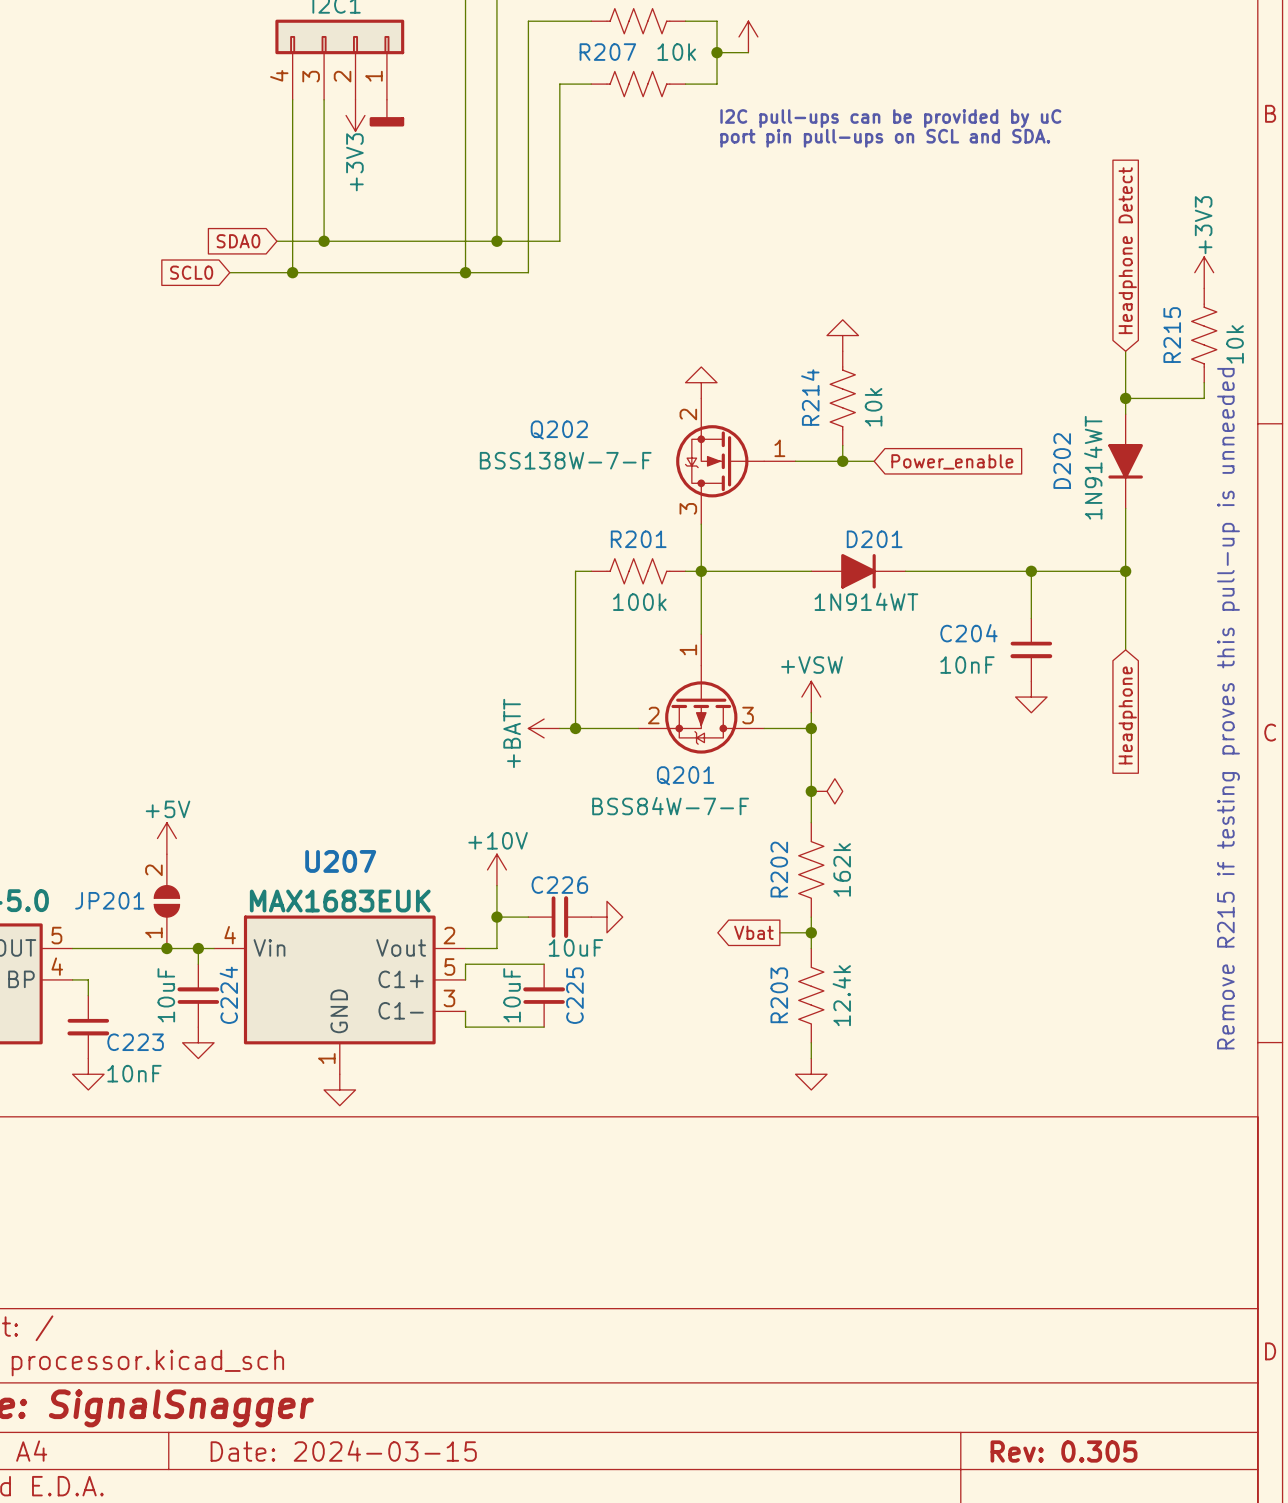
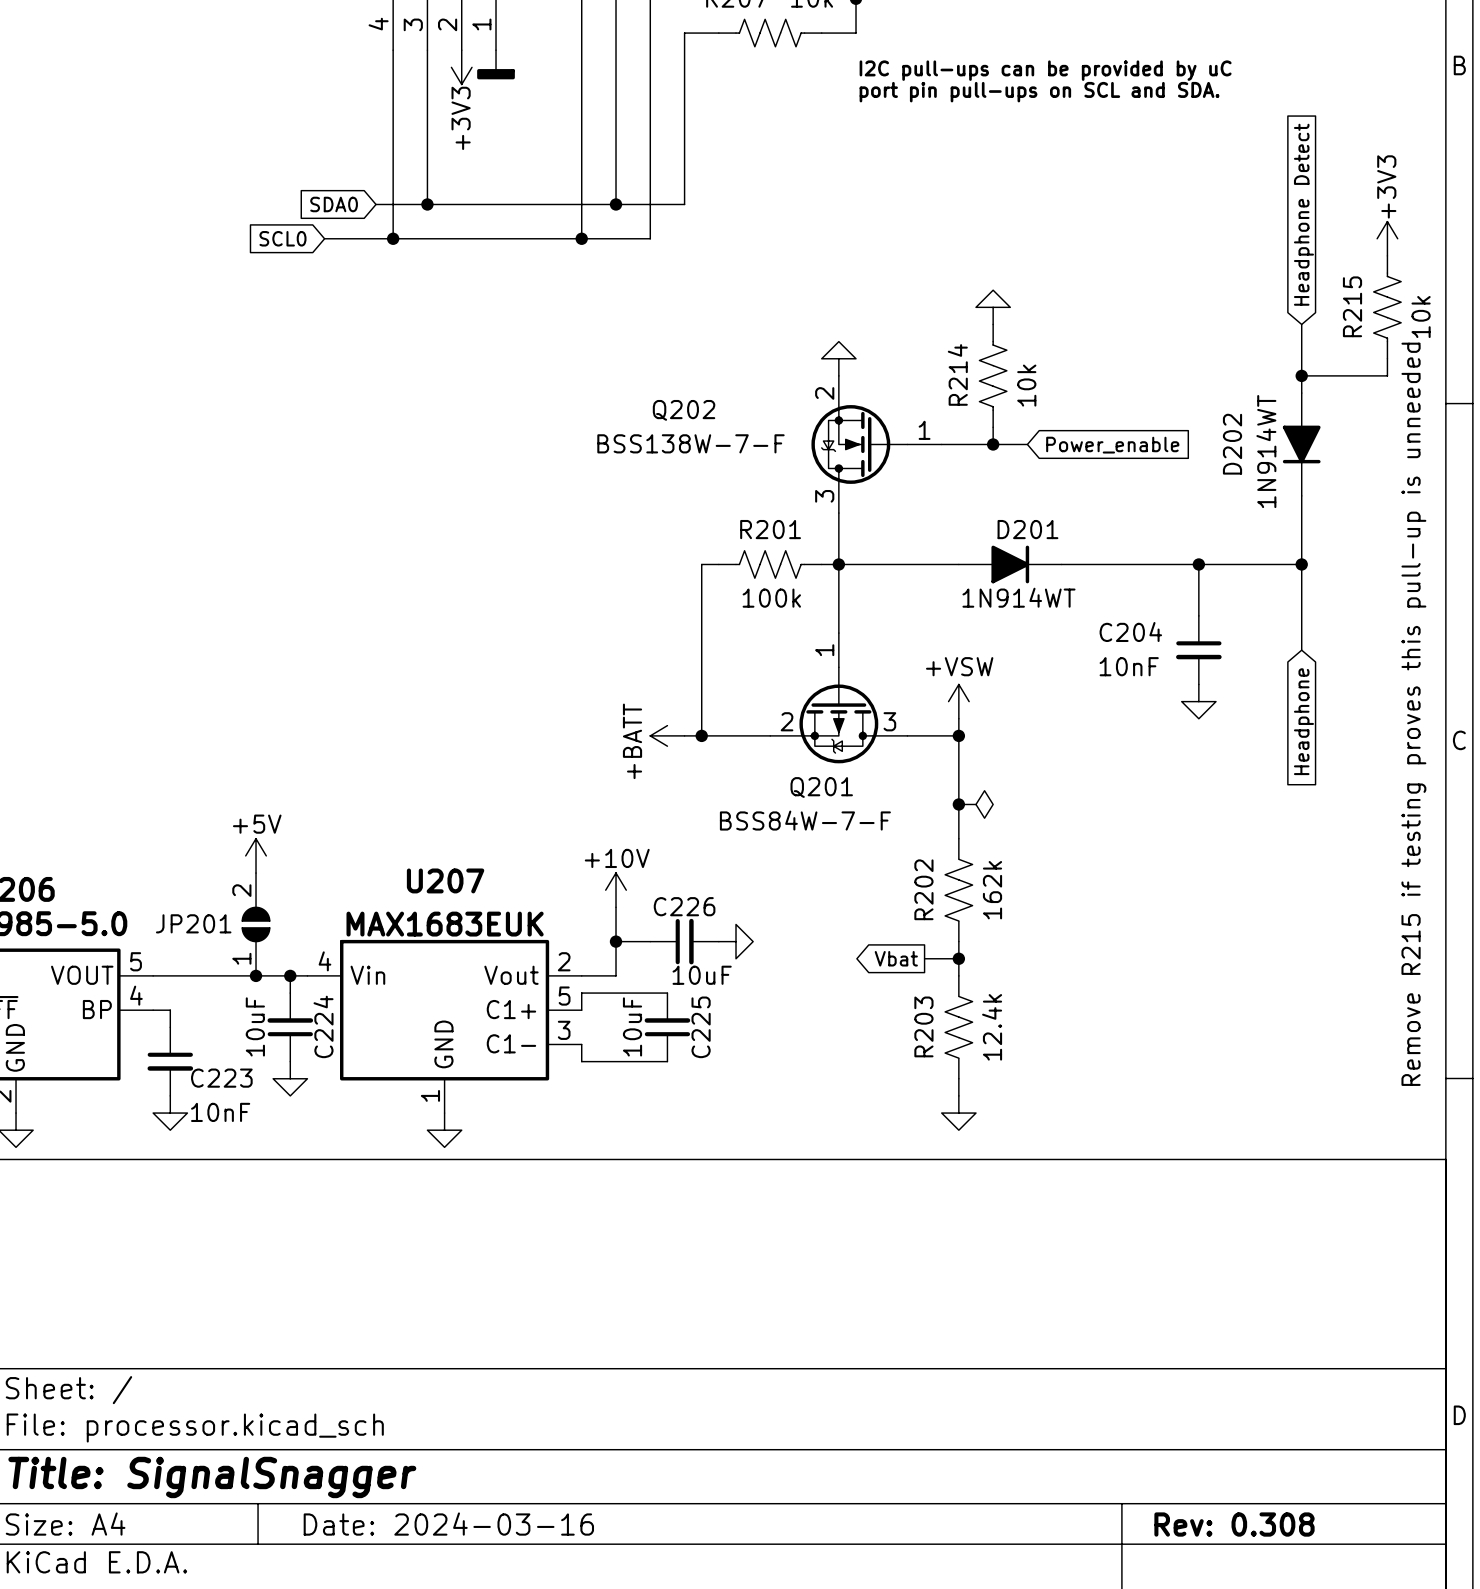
title block: Date: 2024-03-15 (343, 1451) -> Date: 2024-03-16 (448, 1524)
title block: Rev: 0.305 (1064, 1451) -> Rev: 0.308 (1234, 1524)

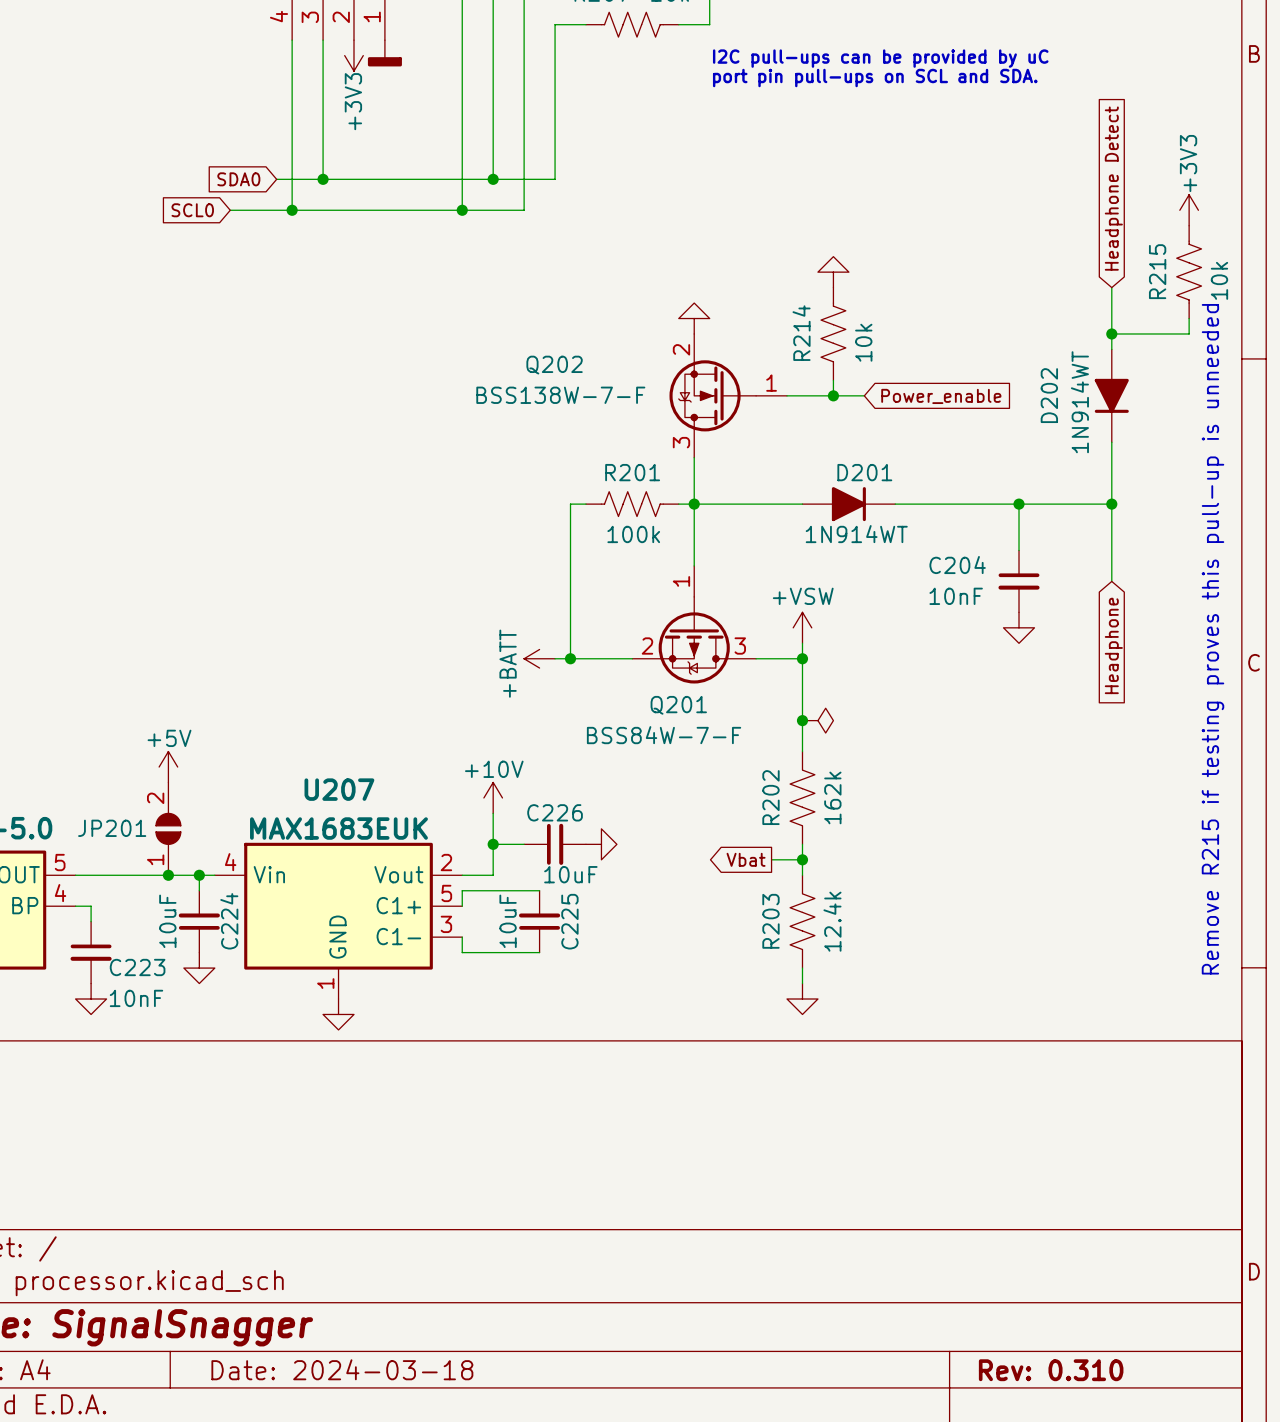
title block: Date: 2024-03-16 (448, 1524) -> Date: 2024-03-18 (342, 1369)
title block: Rev: 0.308 (1234, 1524) -> Rev: 0.310 (1051, 1370)

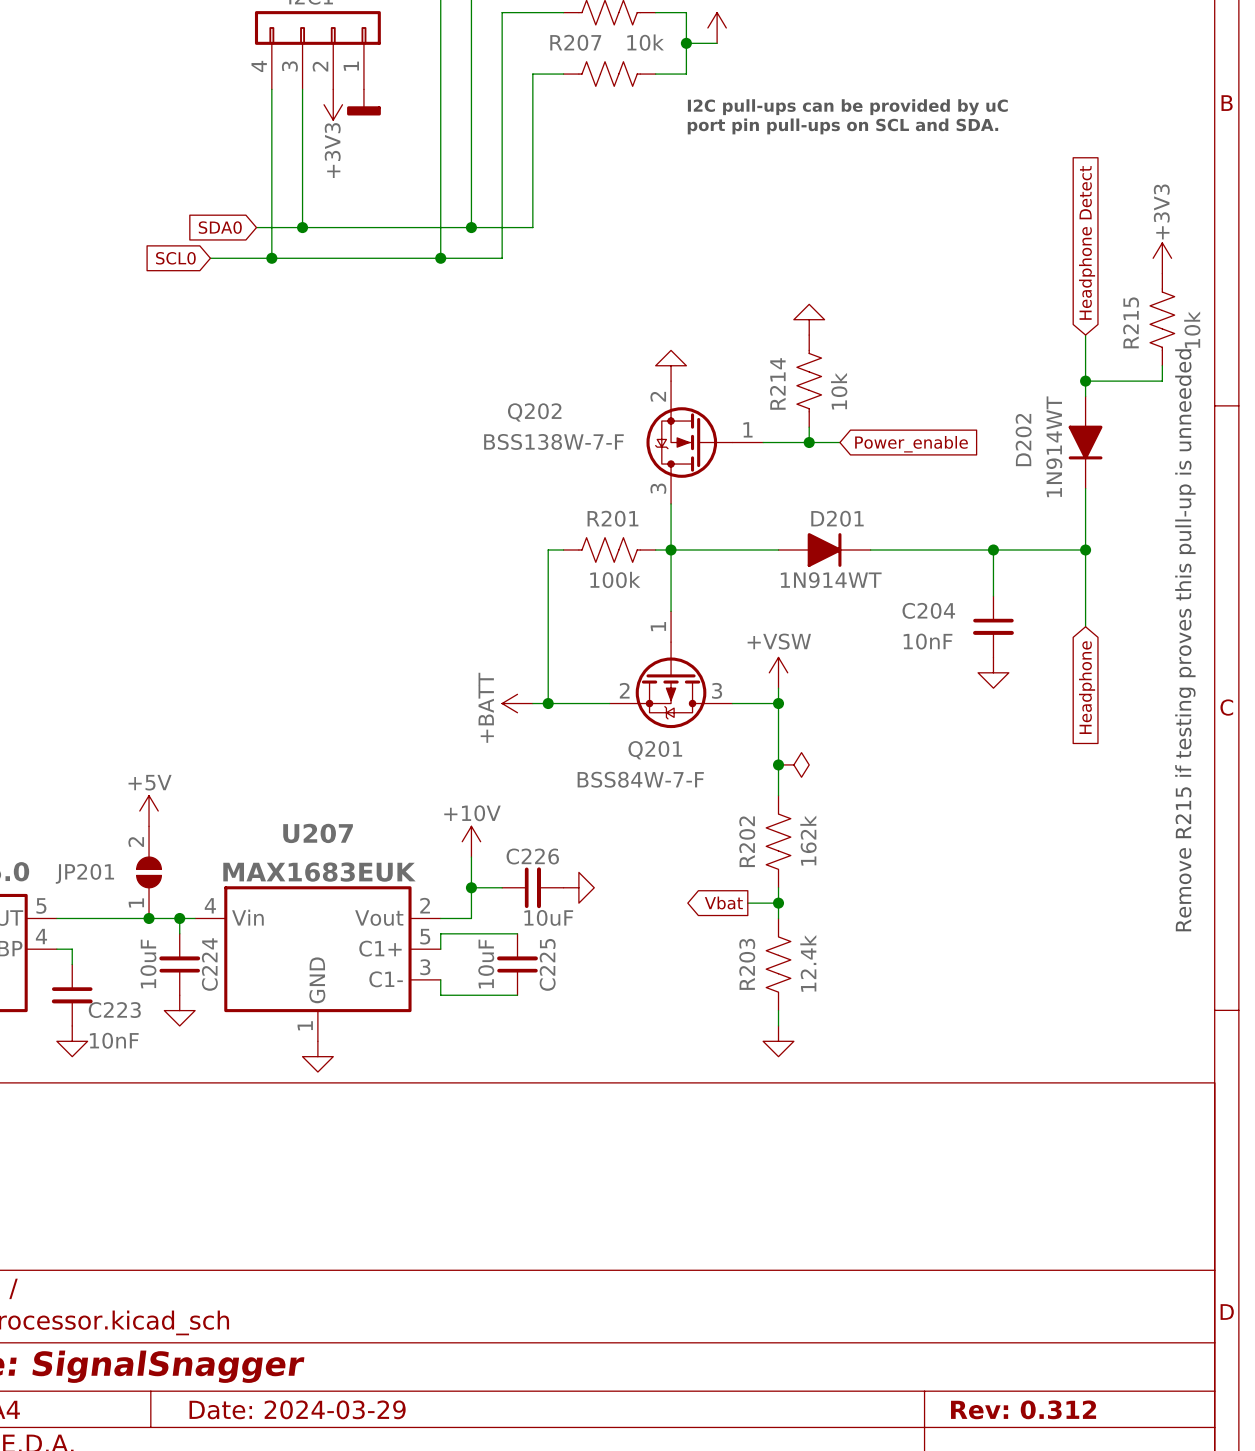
title block: Date: 2024-03-18 (342, 1369) -> Date: 2024-03-29 (297, 1409)
title block: Rev: 0.310 (1051, 1370) -> Rev: 0.312 (1023, 1409)

